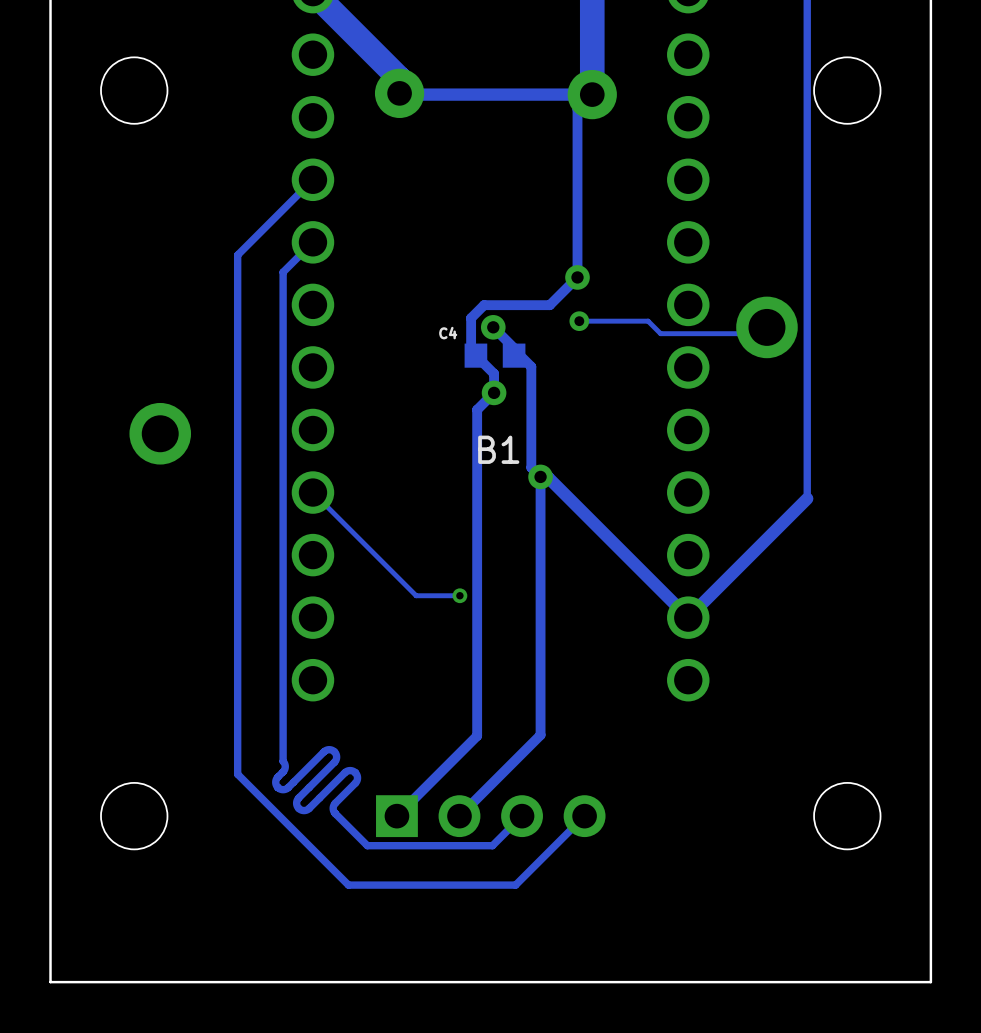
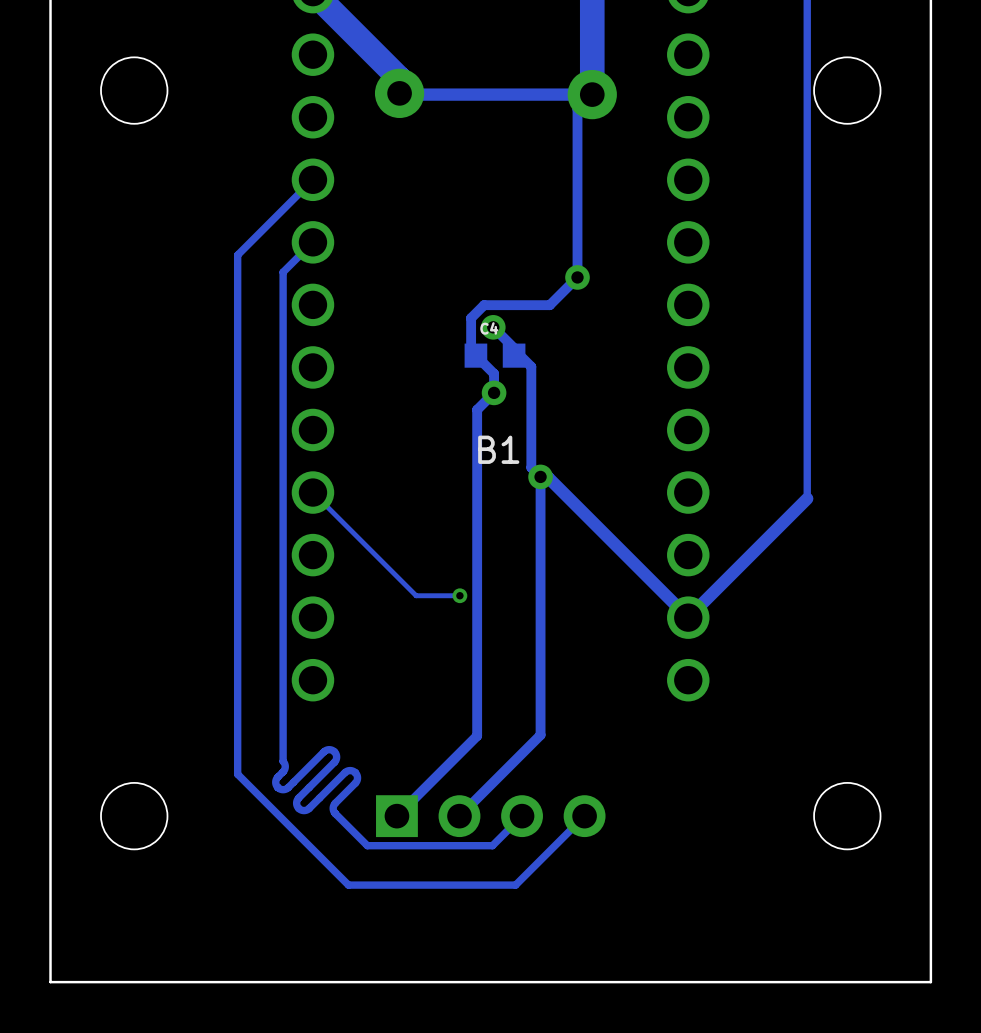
track: (579, 321) (648, 321) (660, 333) (760, 333) (766, 327) -> none
via: (579, 321) -> none
part: (766, 327) -> none
C4 name position: C4 (448, 333) -> C4 (489, 328)
part: (160, 433) -> none

